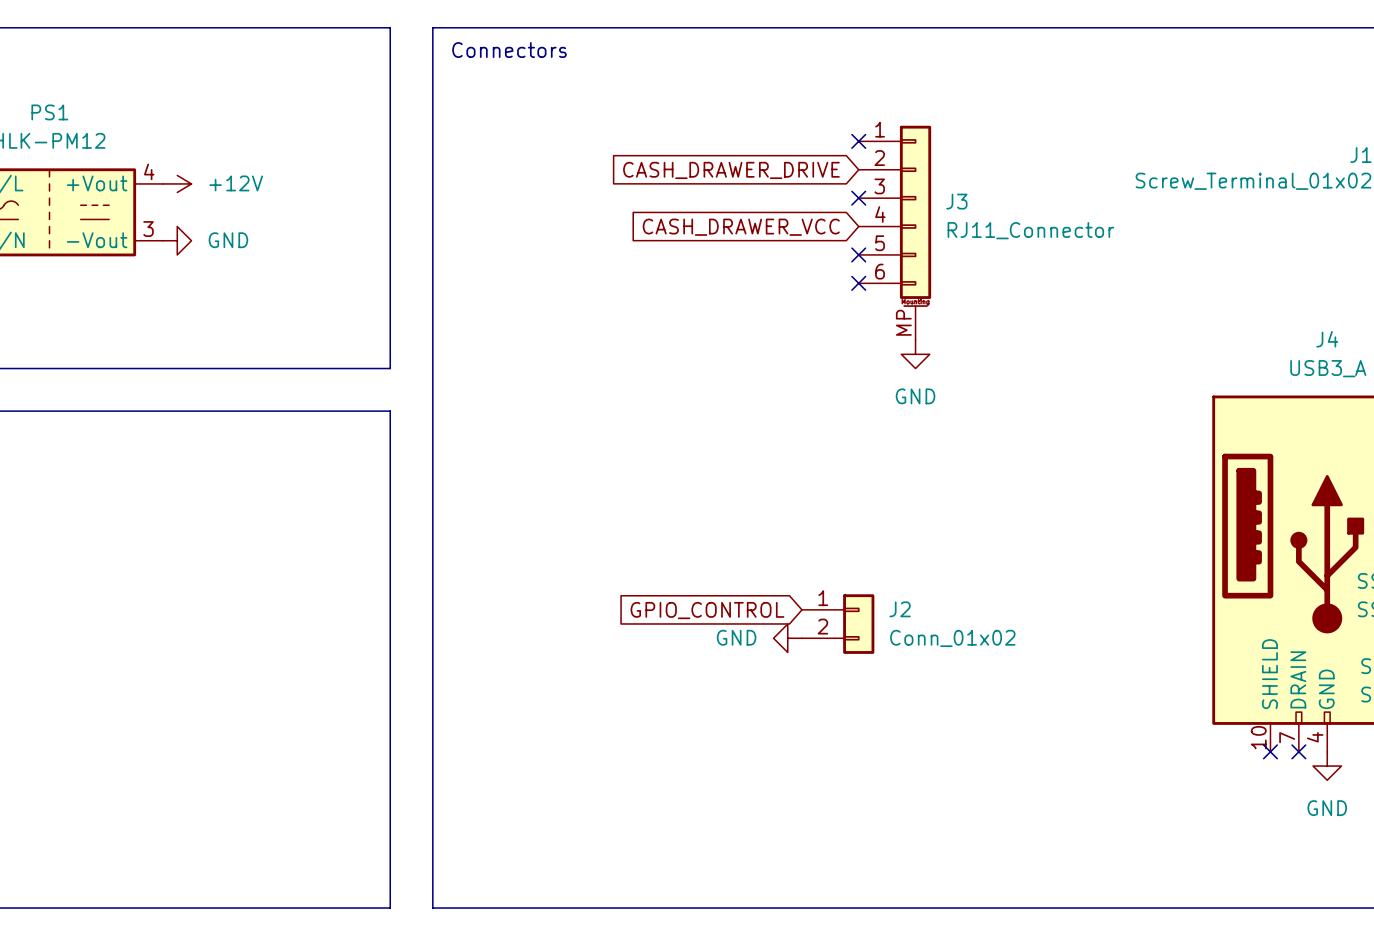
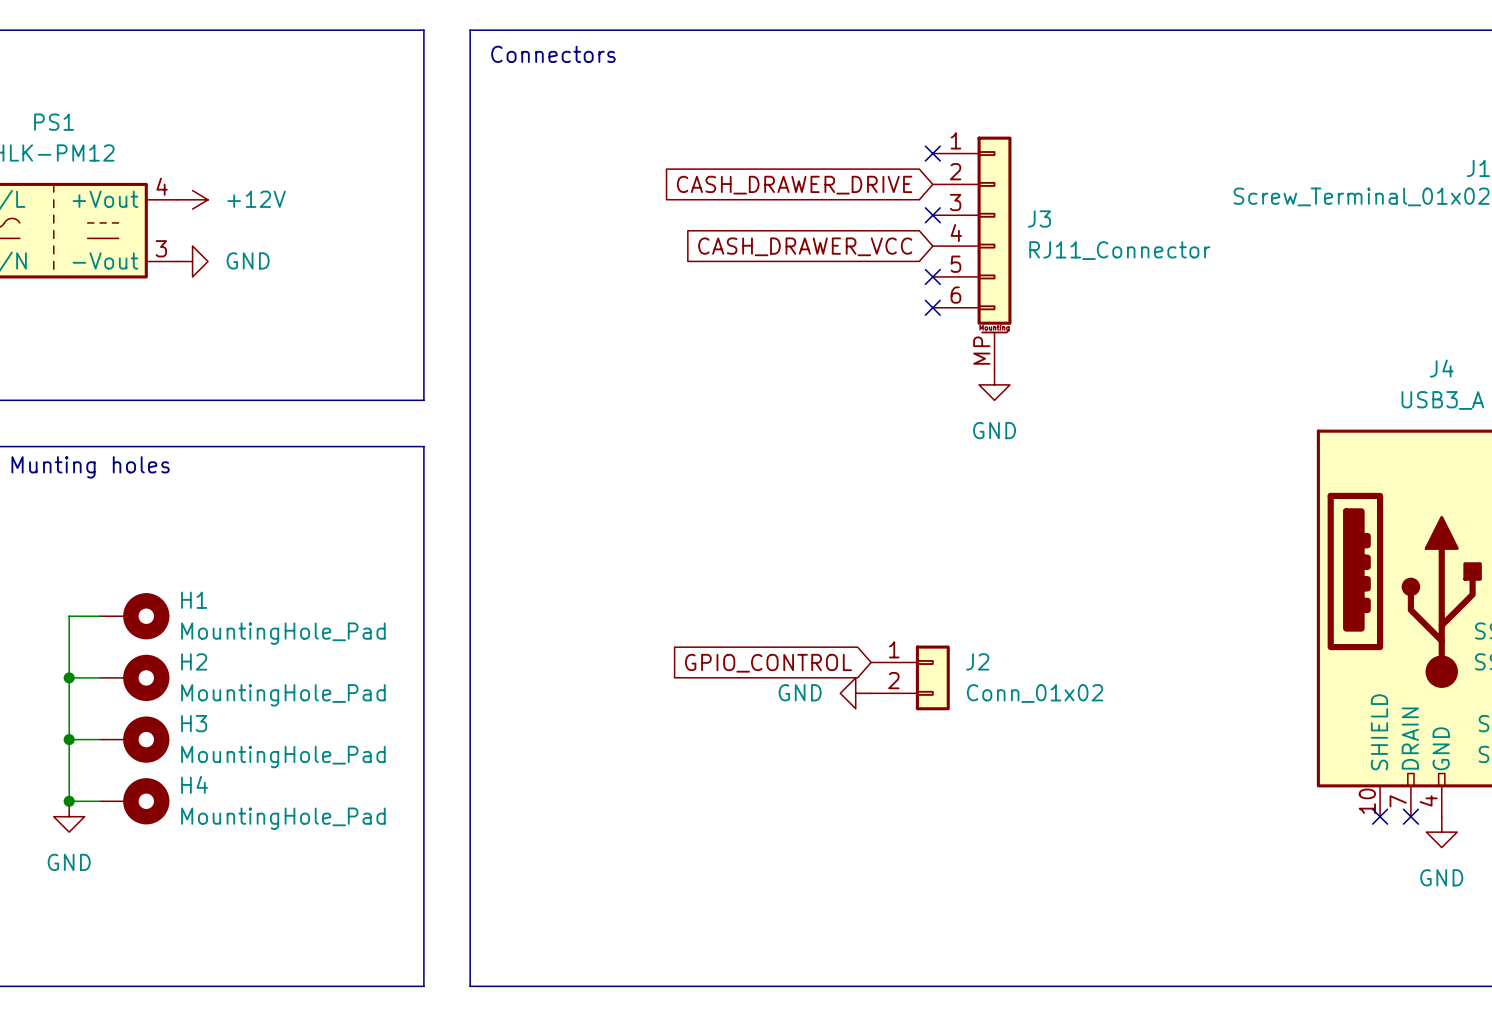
text: none -> Munting holes (90, 467)
wire: none -> (100, 616) (69, 616) (69, 801) (100, 801)
H1: none -> MountingHole_Pad (134, 616)
wire: none -> (69, 677) (100, 677)
junction: none -> (69, 677)
H2: none -> MountingHole_Pad (134, 677)
wire: none -> (69, 739) (100, 739)
junction: none -> (69, 739)
H3: none -> MountingHole_Pad (134, 739)
junction: none -> (69, 801)
H4: none -> MountingHole_Pad (134, 801)
power symbol: none -> GND (69, 816)

